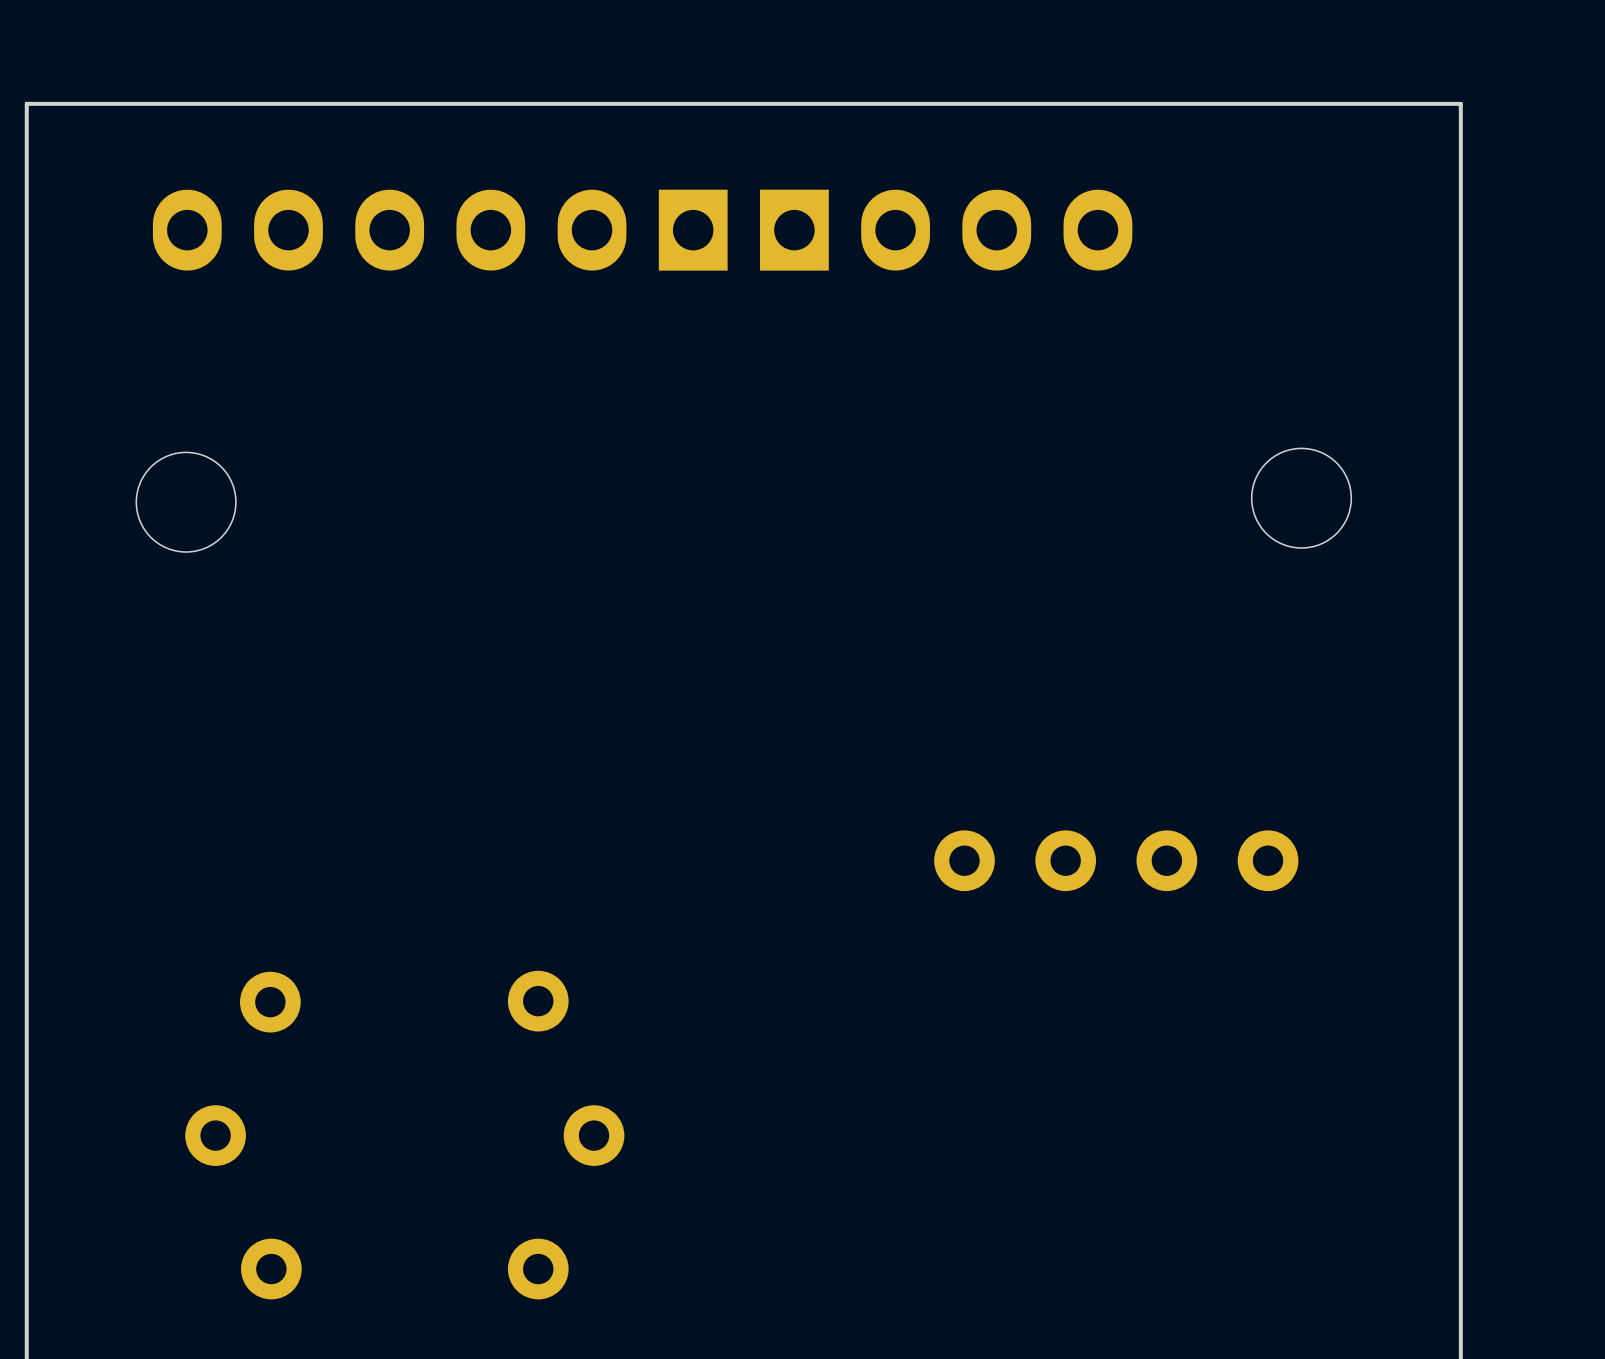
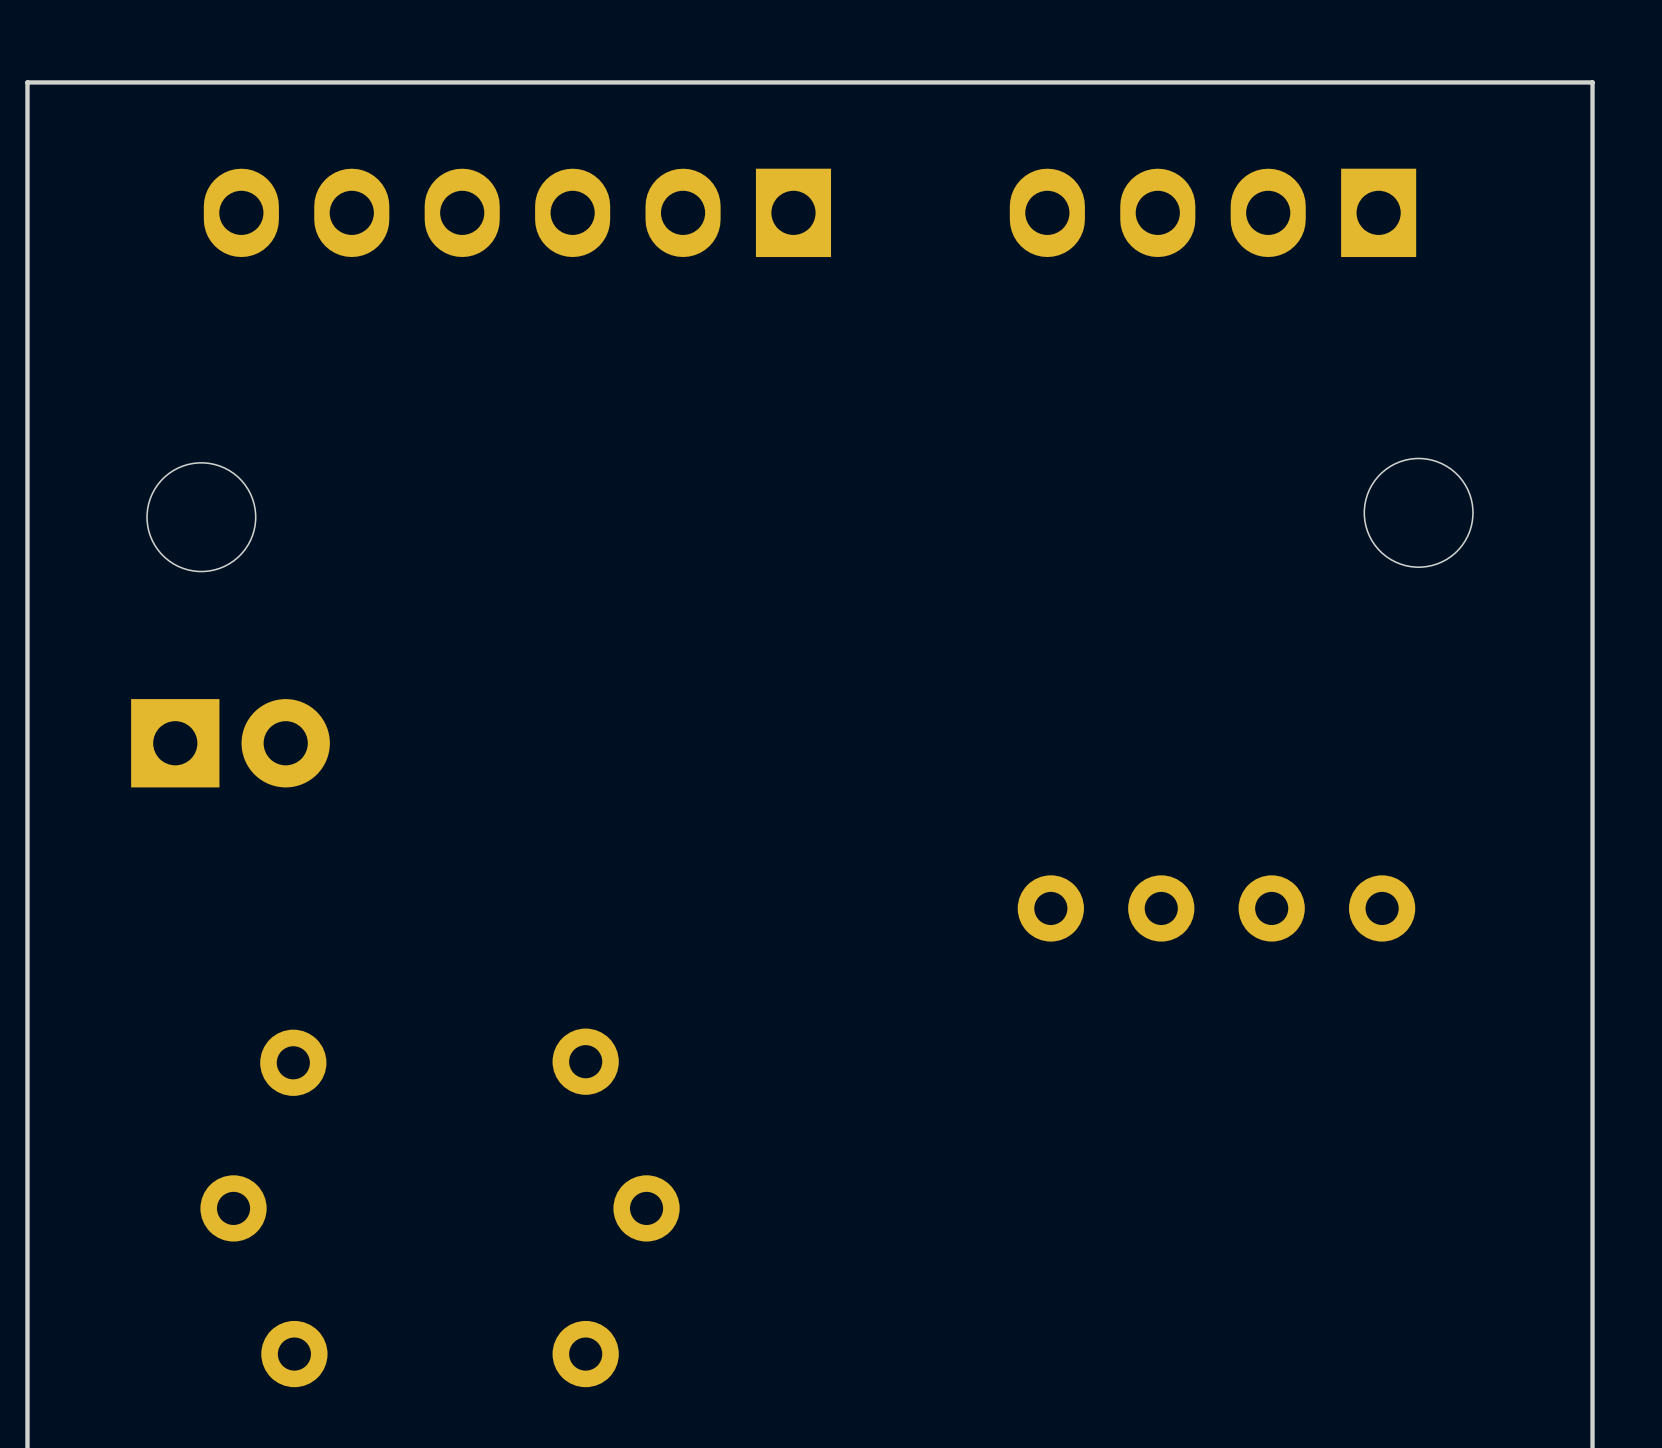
part position: (440, 230) -> (517, 212)
part rotation: 0° (946, 230) -> 180° (1213, 212)
part: none -> (230, 743)

